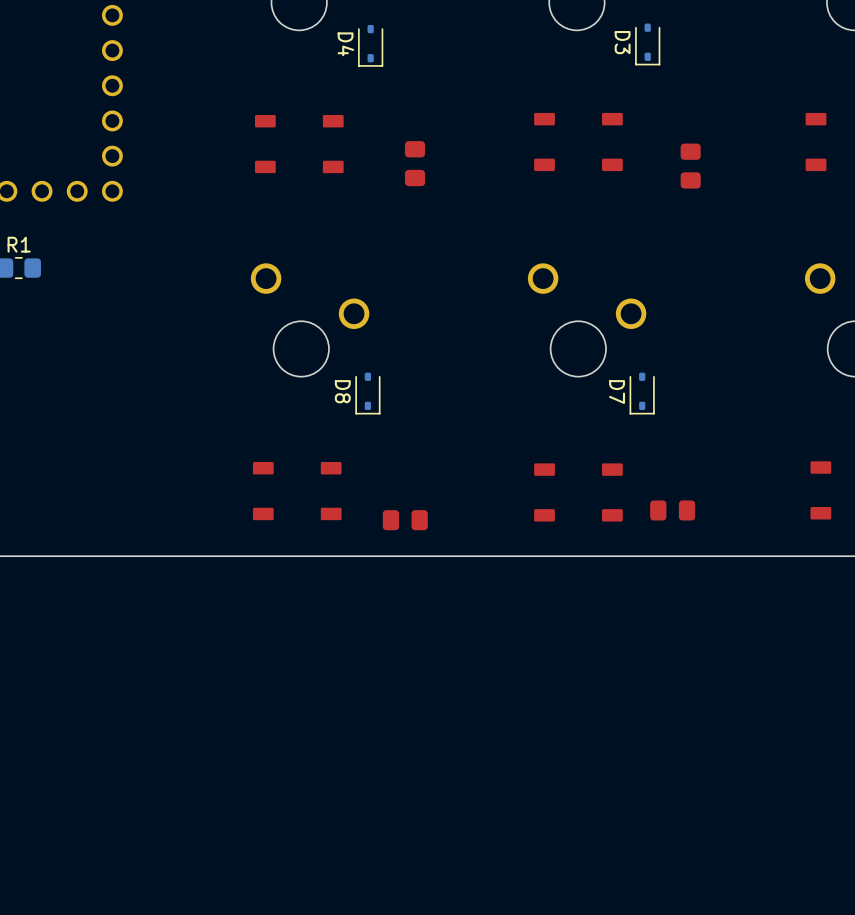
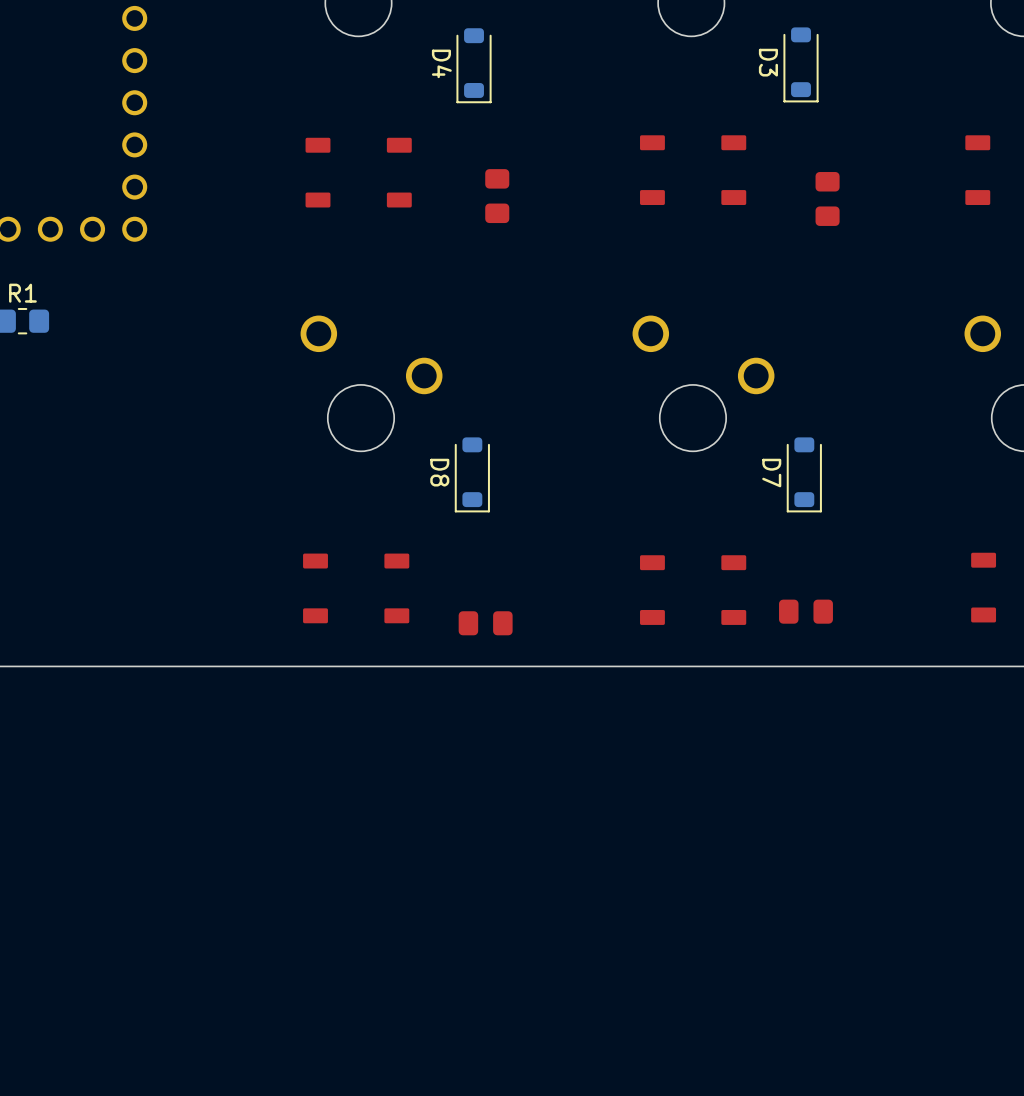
D3 footprint: [635, 23, 661, 66] -> [783, 27, 819, 103]
D4 footprint: [358, 24, 384, 67] -> [456, 28, 492, 104]
D8 footprint: [355, 372, 381, 415] -> [454, 437, 490, 513]
D7 footprint: [629, 372, 655, 415] -> [786, 437, 822, 513]

